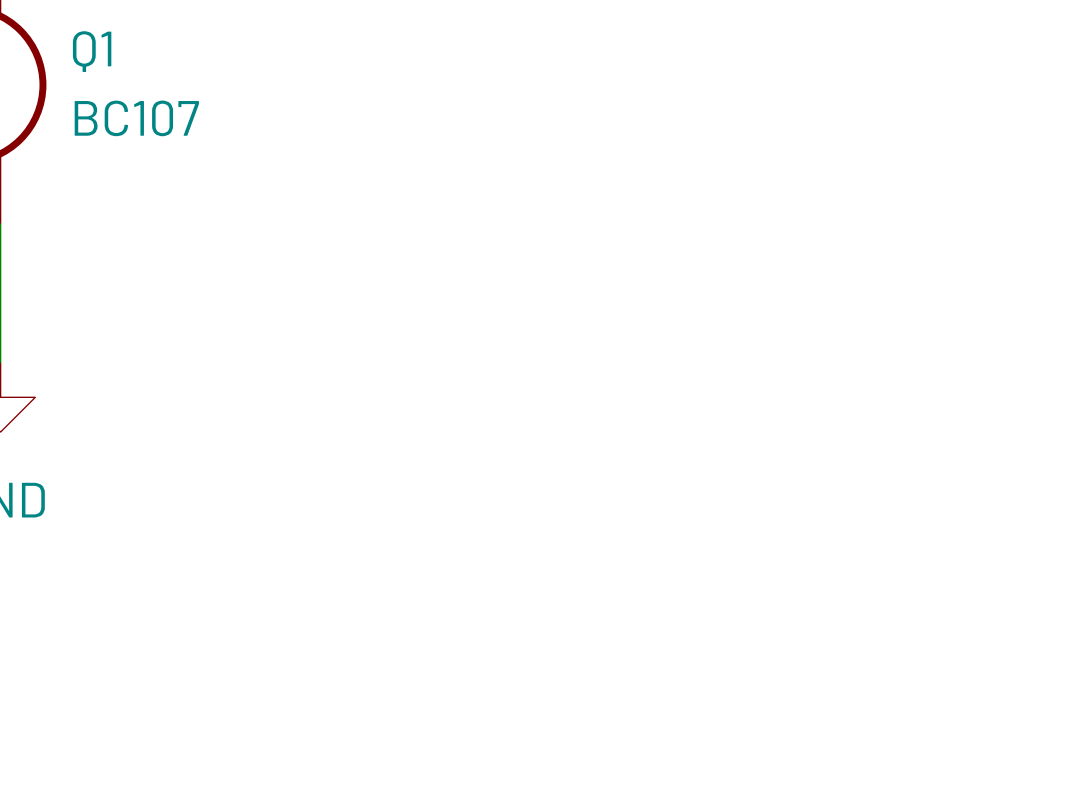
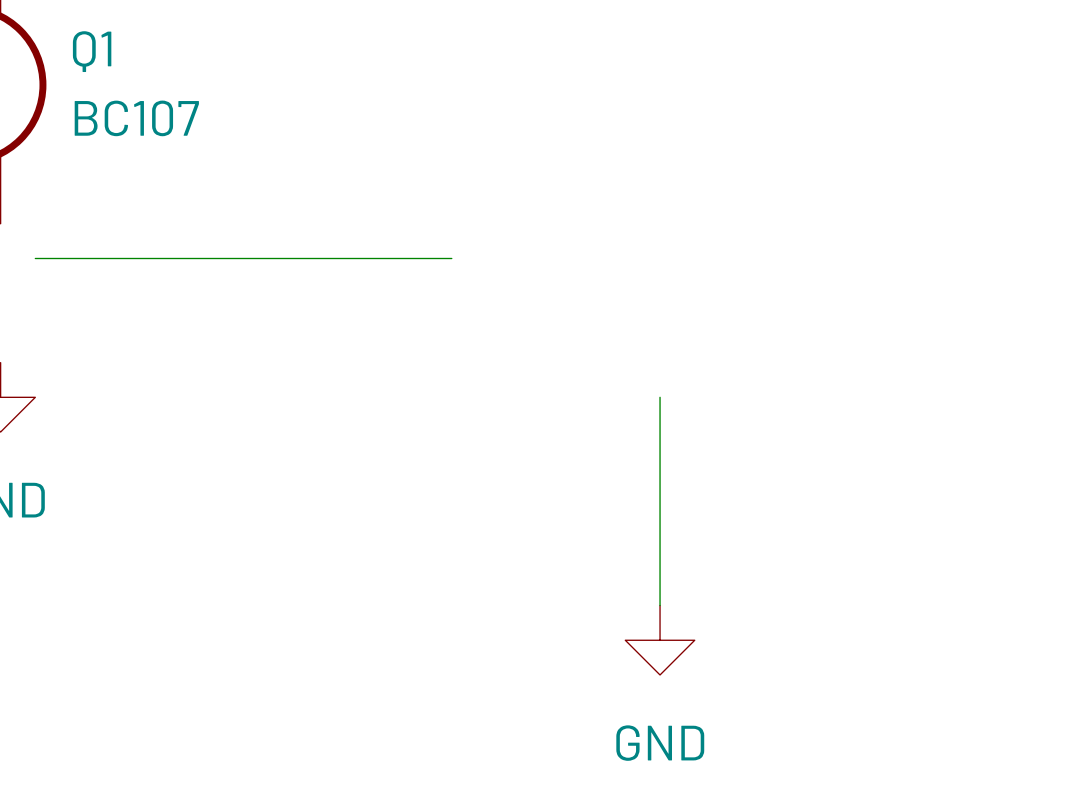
wire: (0, 223) (0, 362) -> none
wire: none -> (35, 258) (451, 258)
wire: none -> (660, 397) (660, 605)
power symbol: none -> GND (660, 640)

